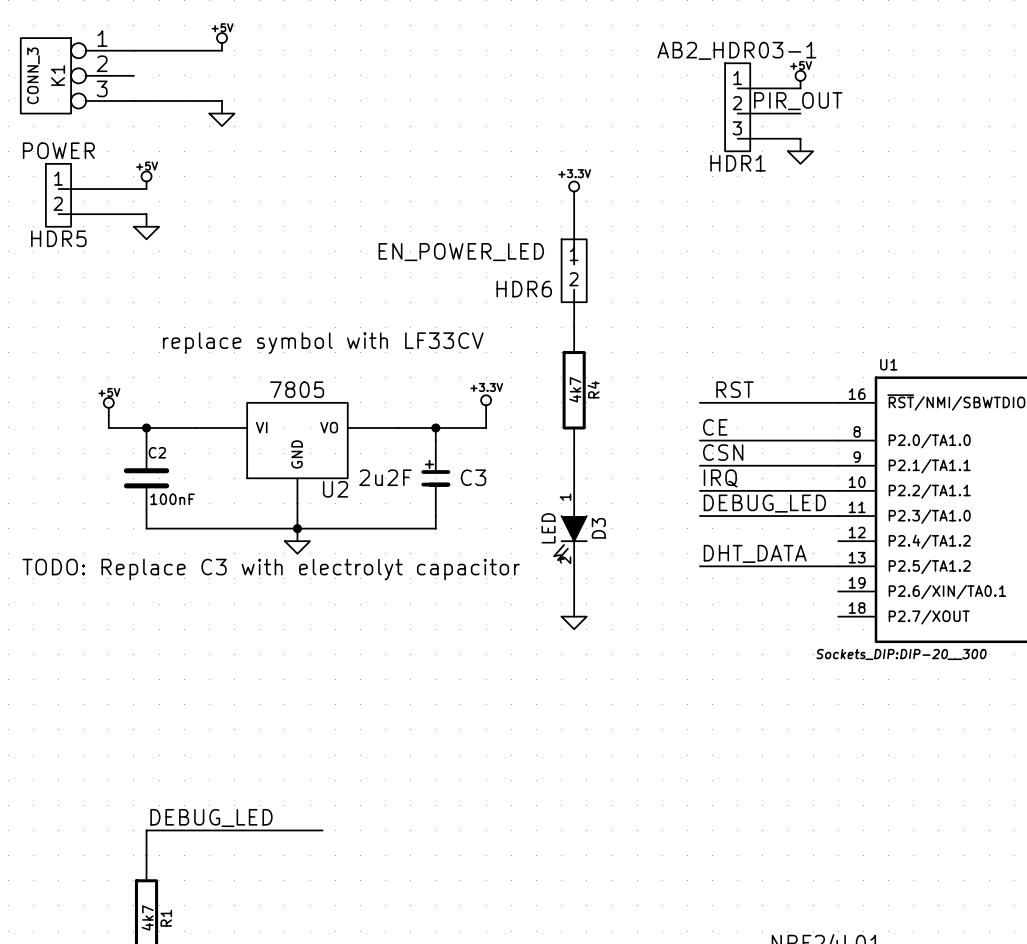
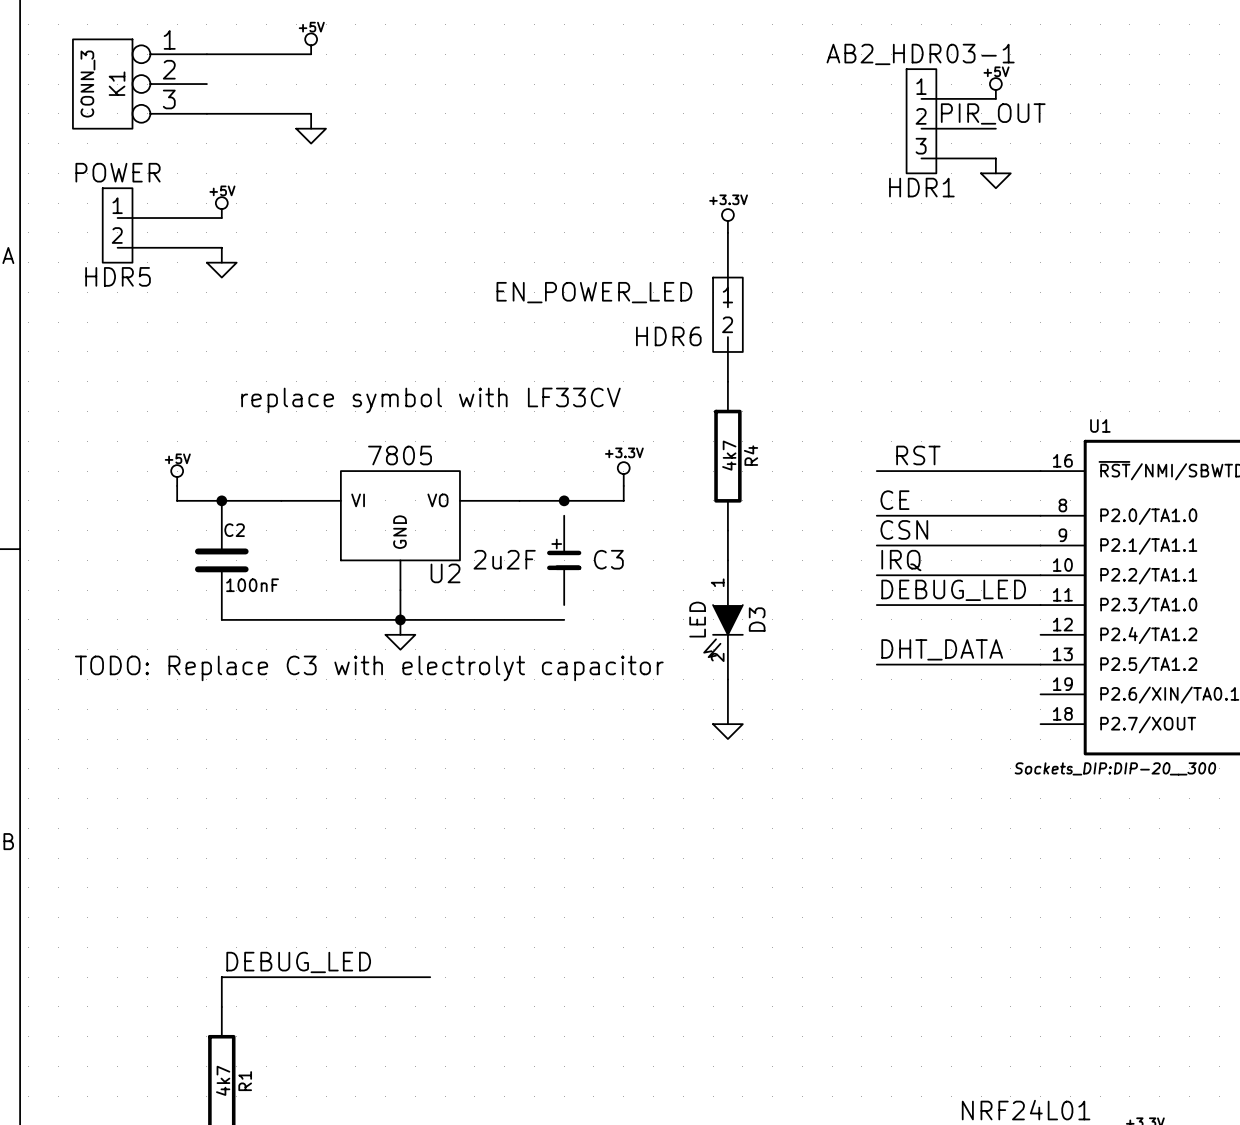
wire: (435, 427) (435, 440) -> none
wire: (435, 516) (435, 528) -> none

